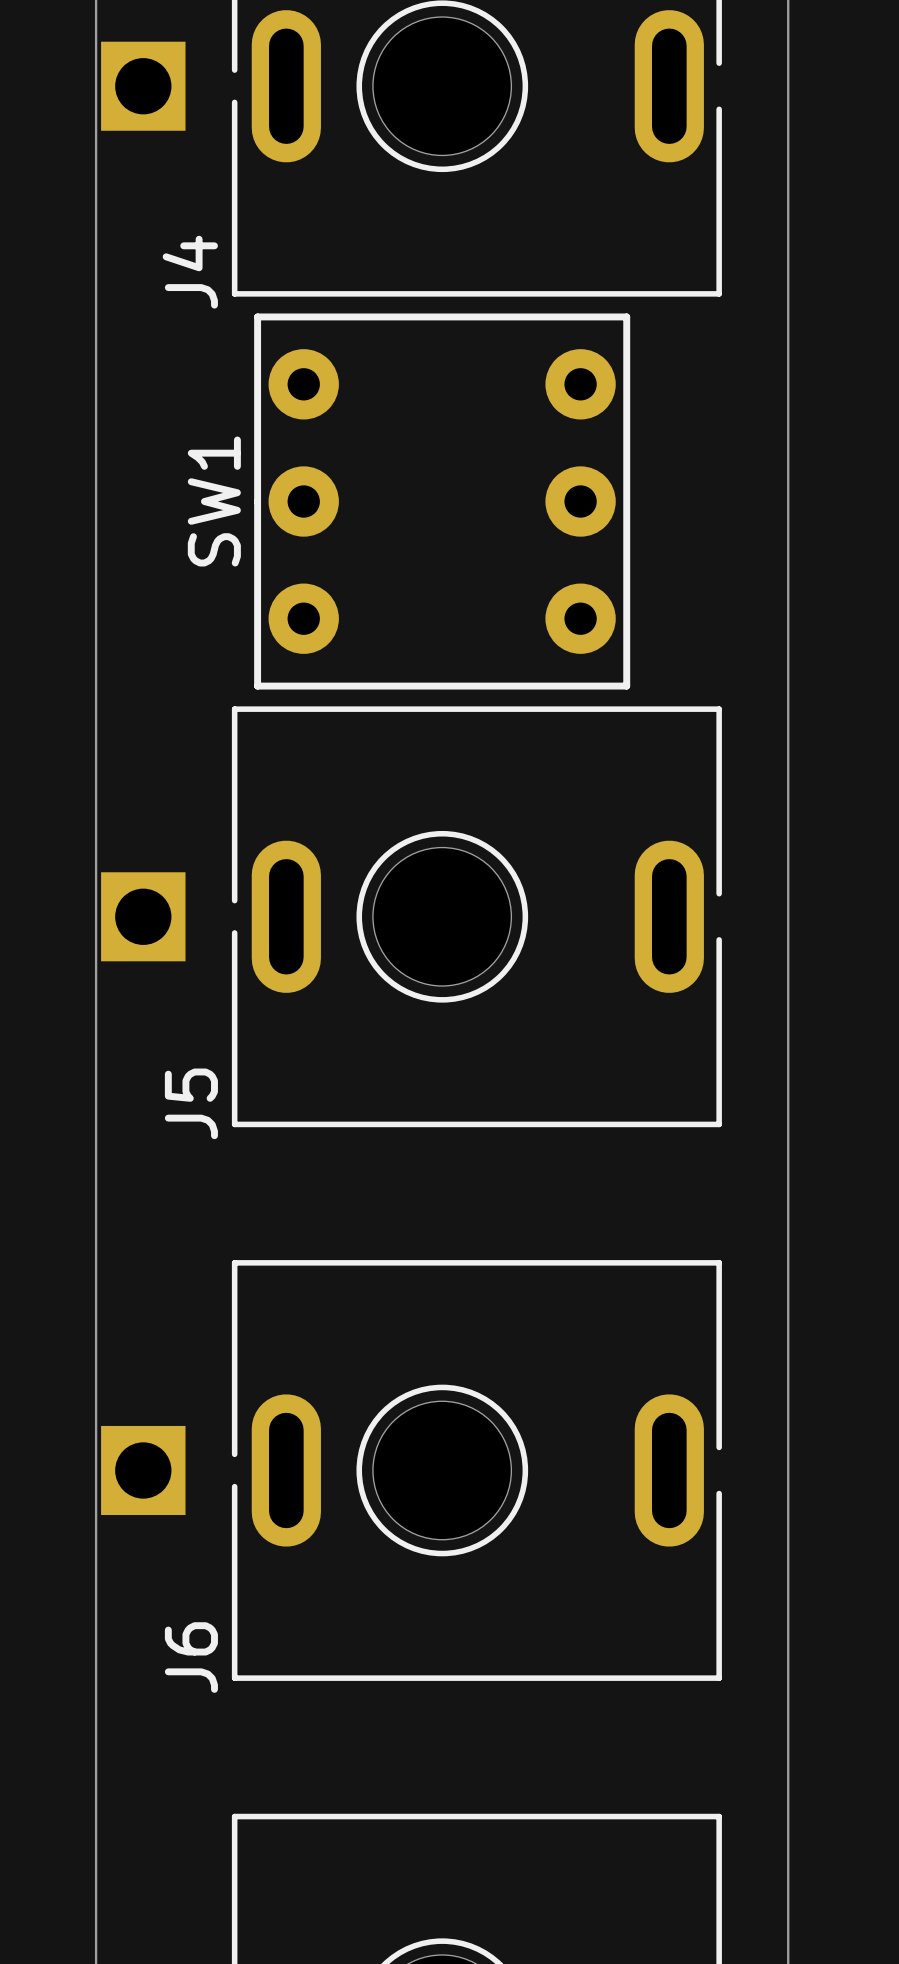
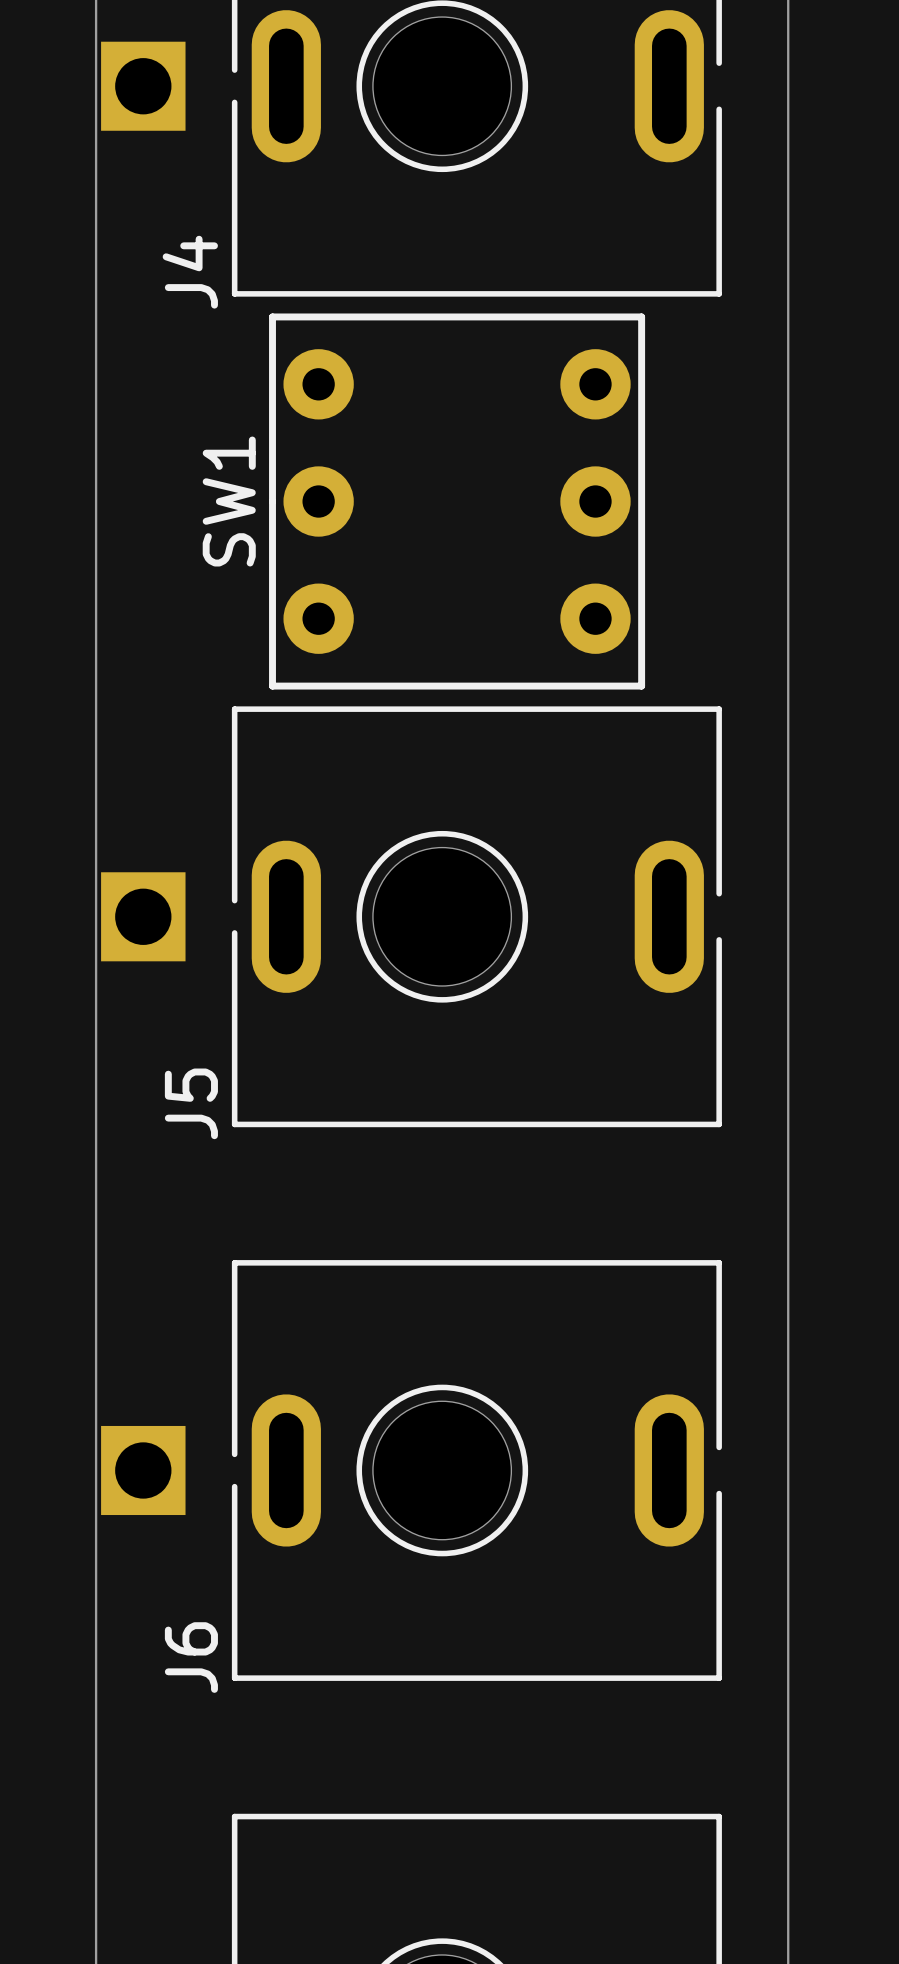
SW1 position: (442, 501) -> (457, 501)

